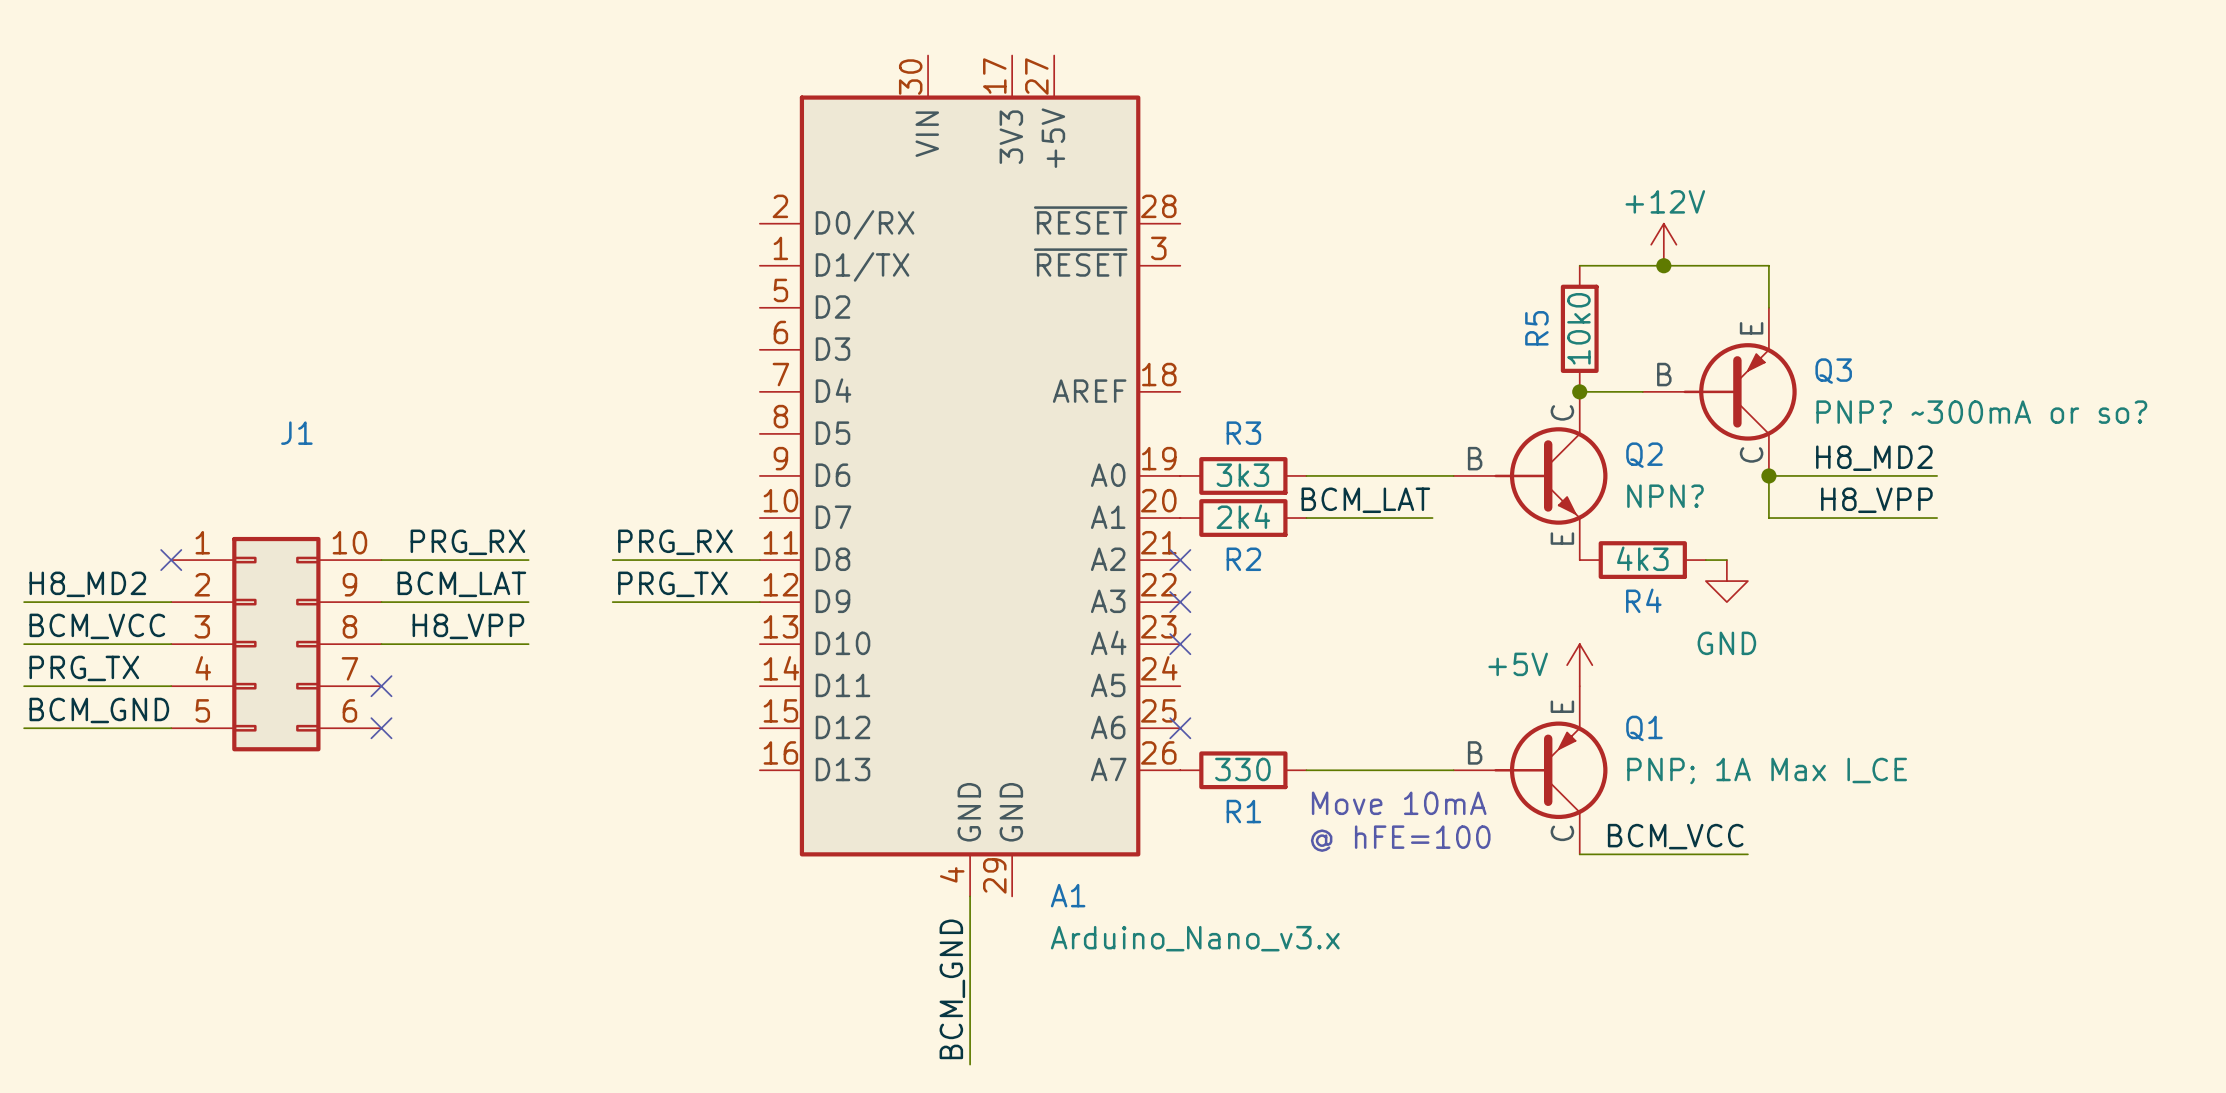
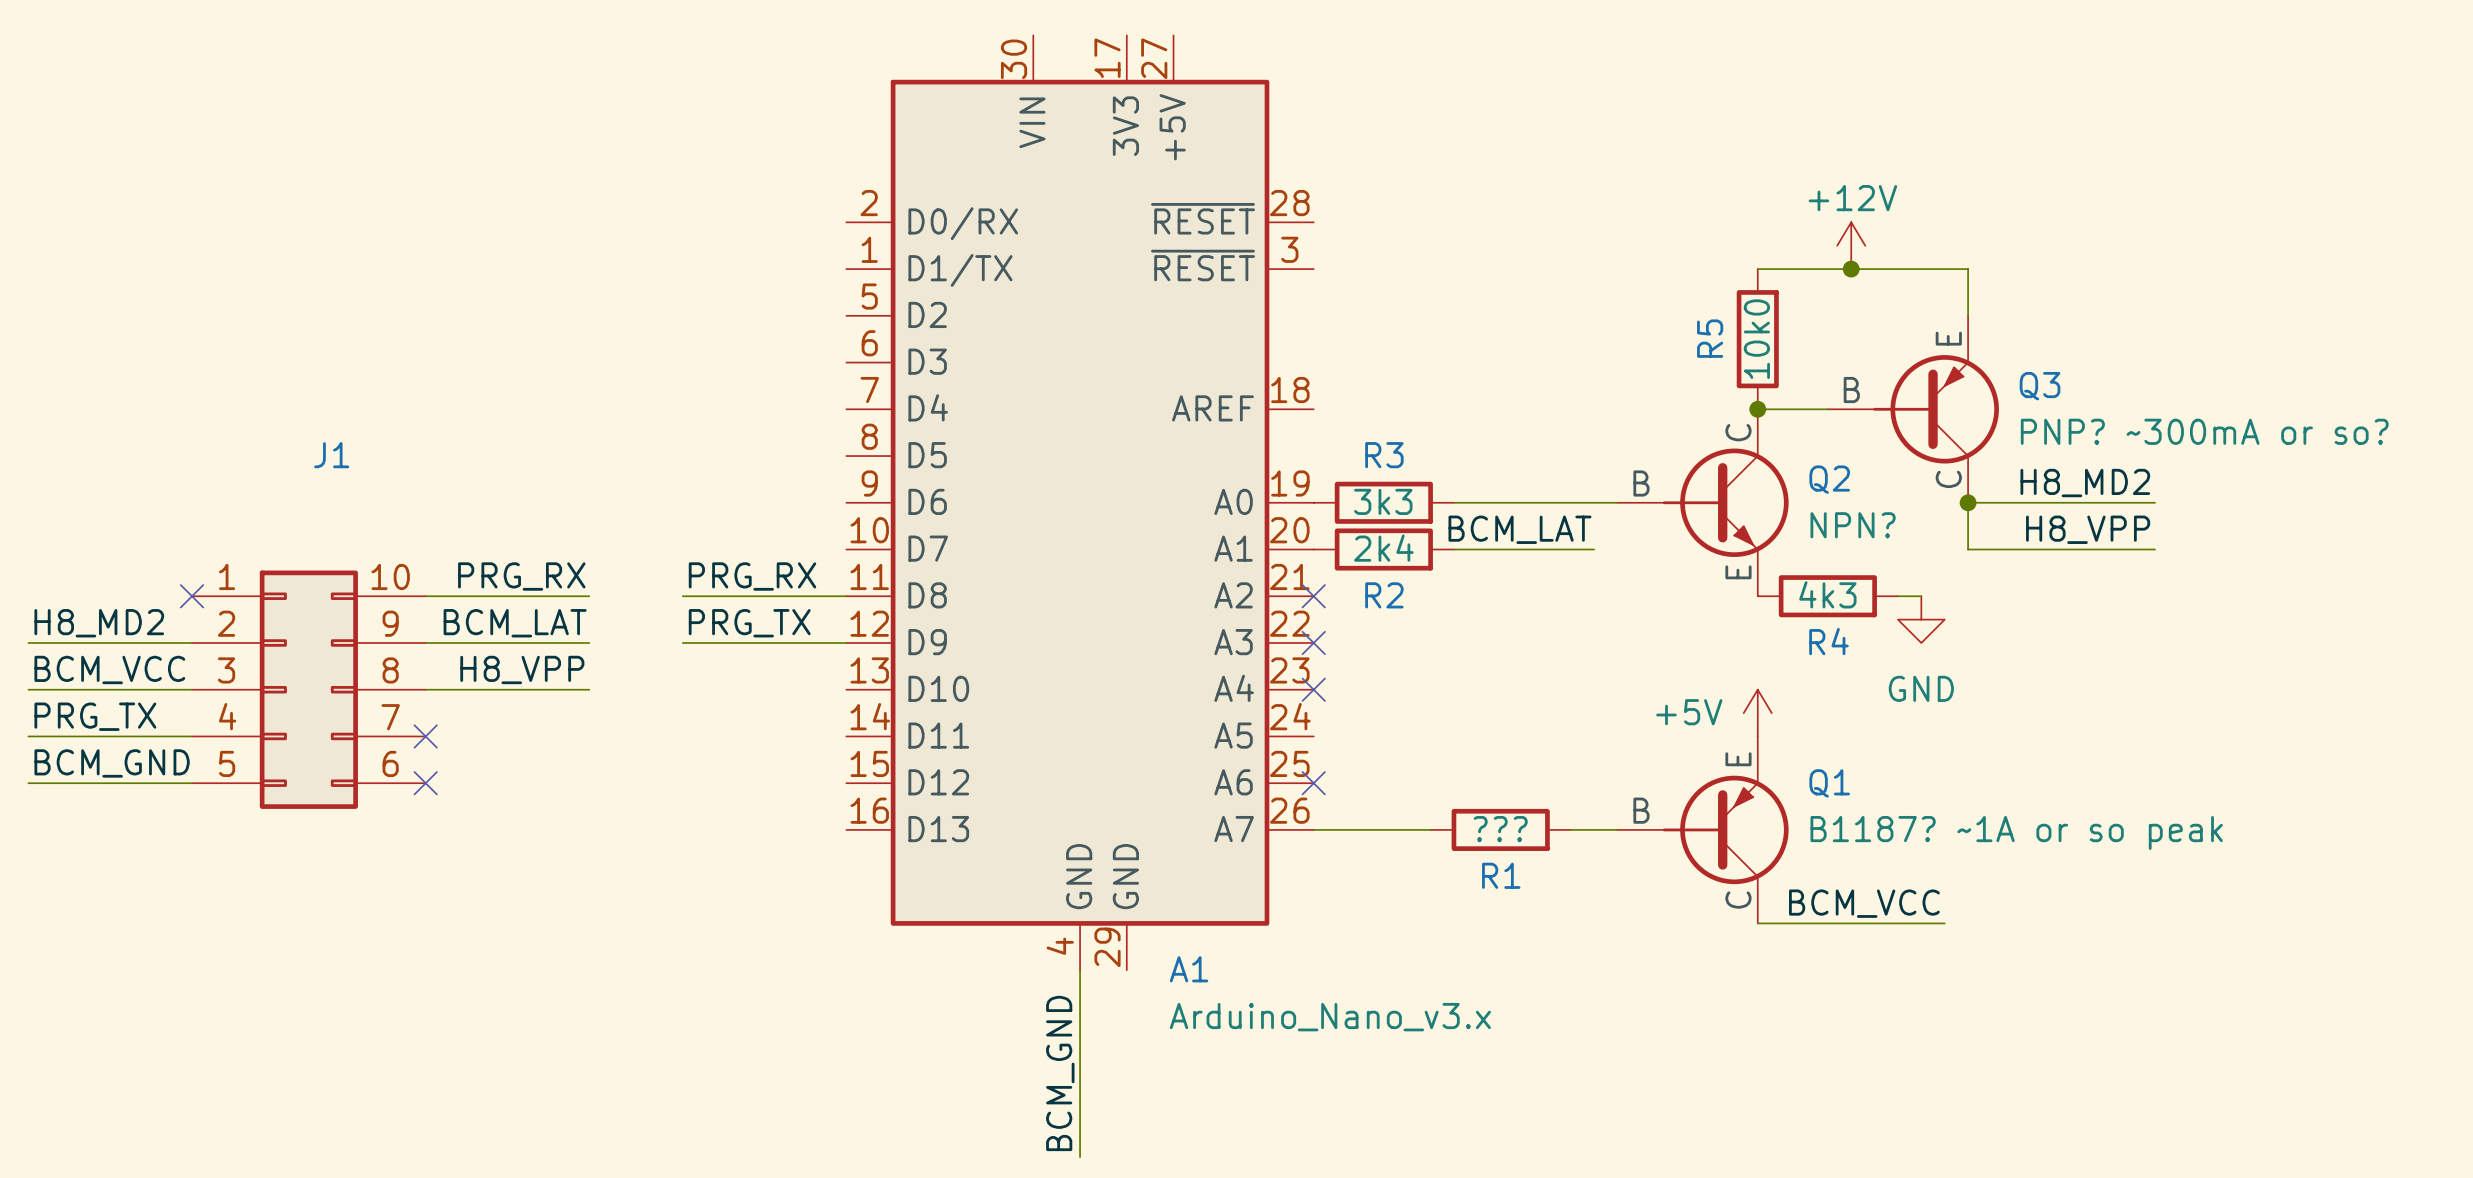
R1 value: 330 (1242, 769) -> ??? (1500, 829)
R1 position: (1243, 770) -> (1500, 829)
wire: (1306, 770) (1411, 770) -> (1313, 829) (1430, 829)
Q1 value: PNP; 1A Max I_CE (1767, 770) -> B1187? ~1A or so peak (2016, 832)
text: Move 10mA (1399, 803) -> none
text: @ hFE=100 (1400, 838) -> none

